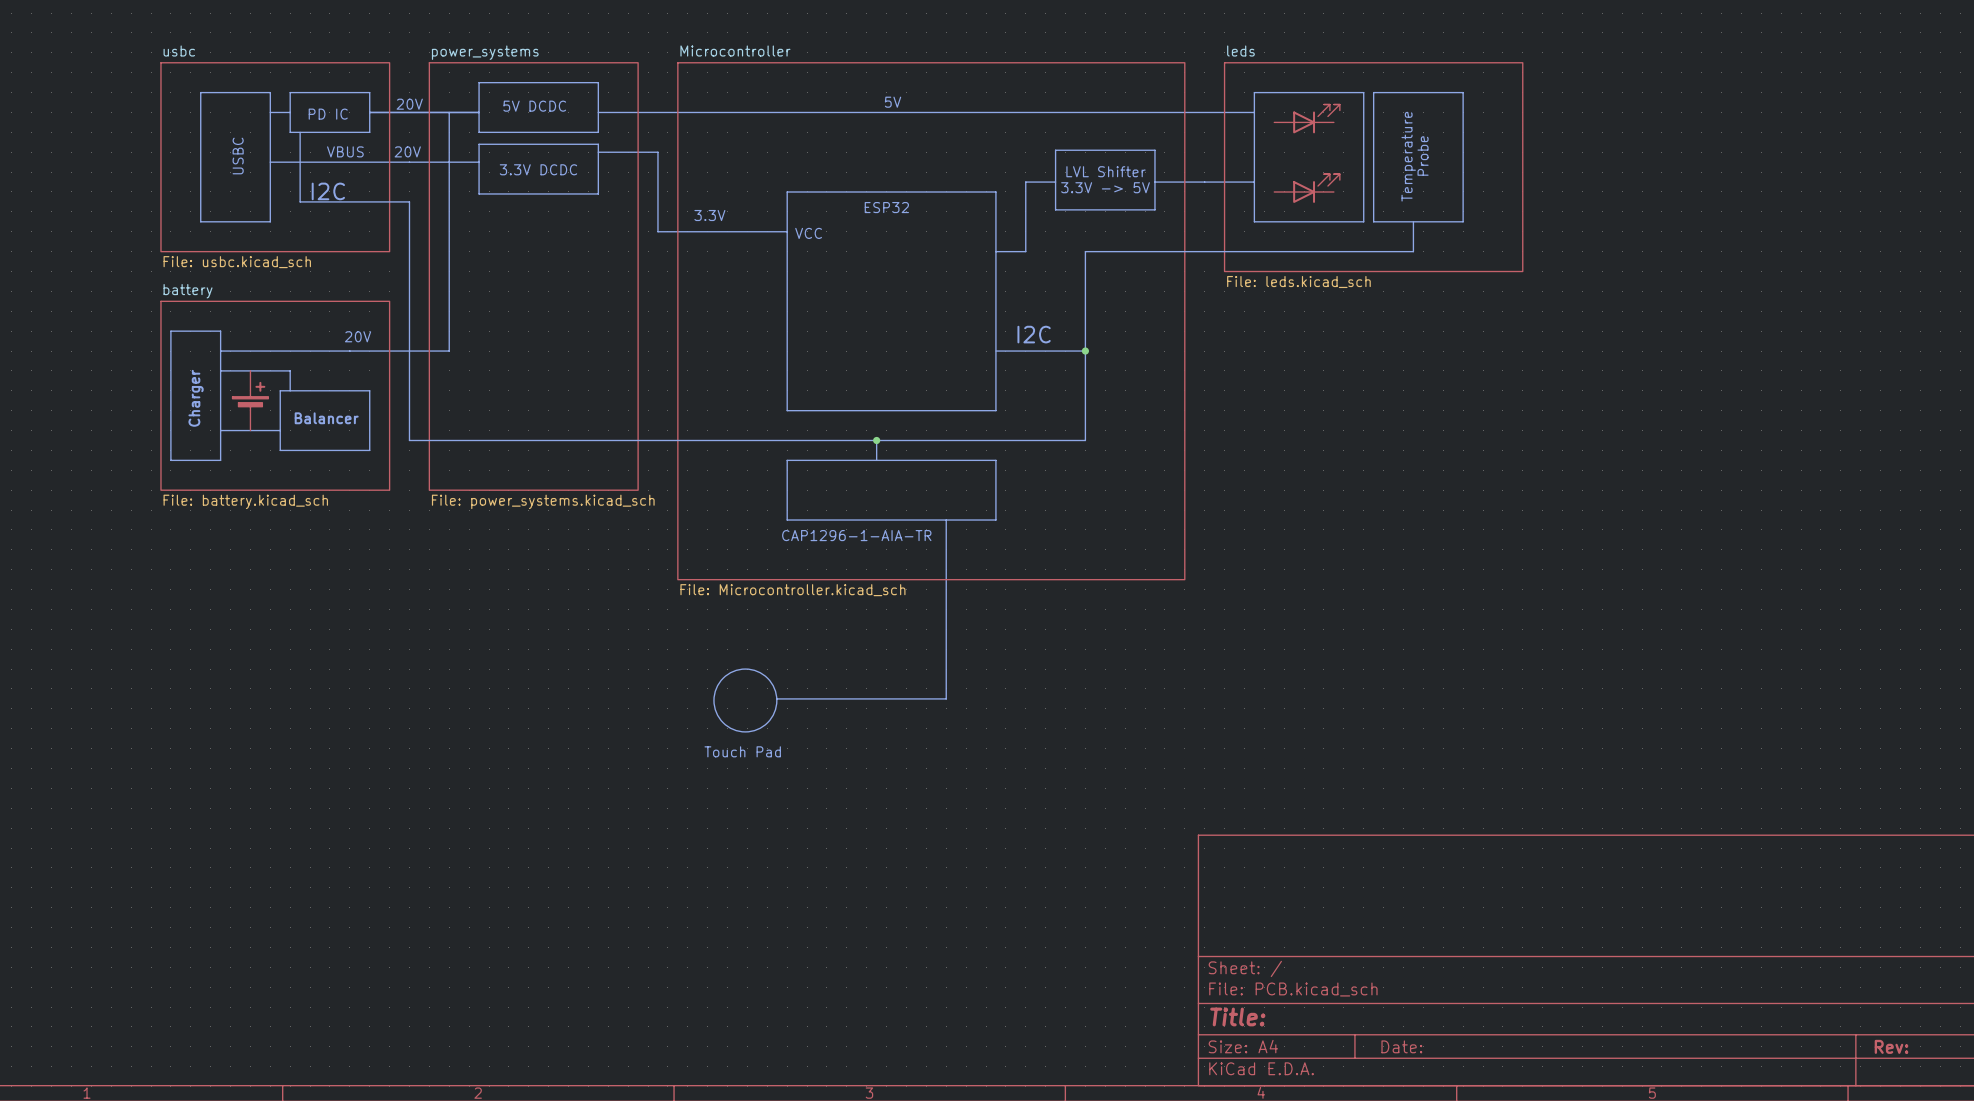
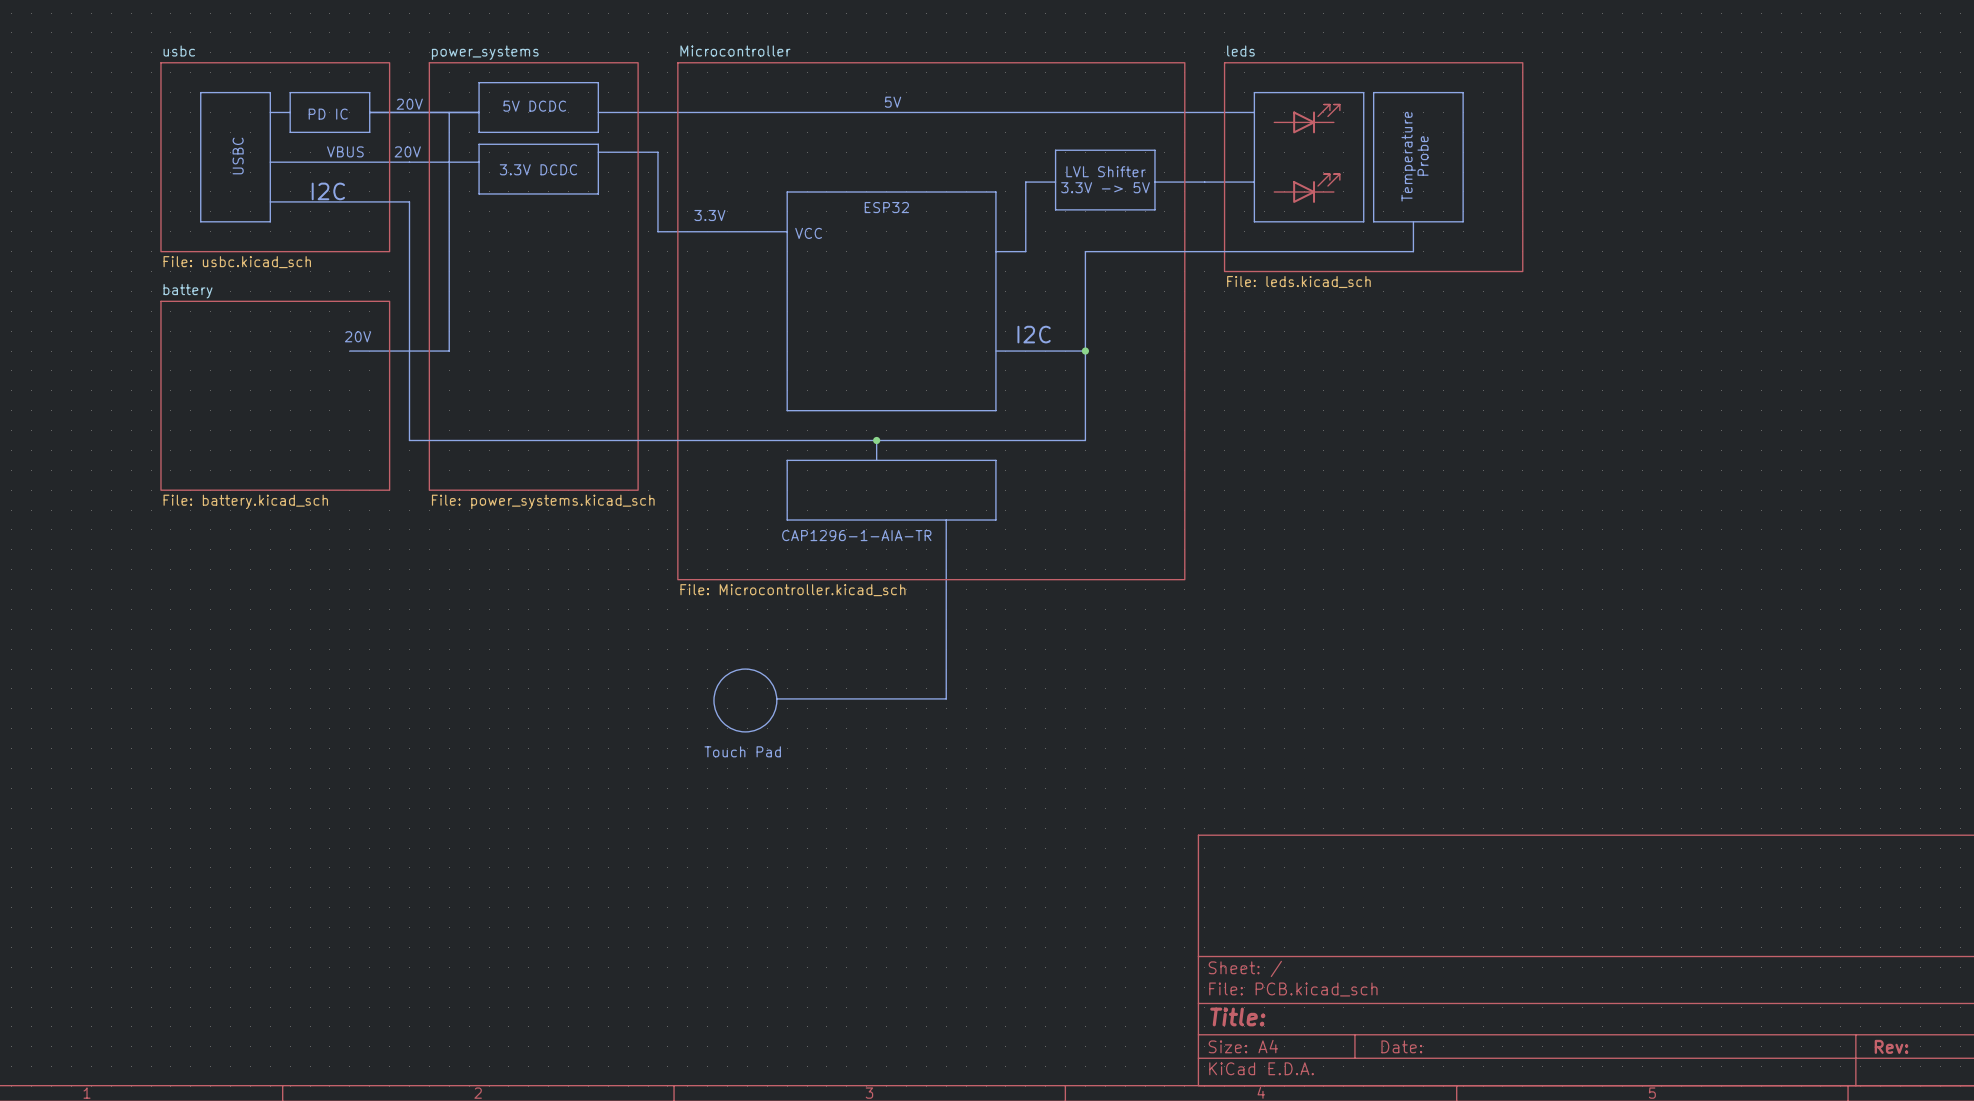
bus: (300, 132) (300, 201) -> (270, 201) (300, 201)
line: (170, 331) (220, 331) (220, 460) (170, 460) (170, 331) -> none
line: (220, 351) (349, 351) -> none
line: (220, 370) (290, 370) (290, 390) -> none
line: (280, 390) (369, 390) (369, 450) (280, 450) (280, 390) -> none
text: Charger (196, 398) -> none
part: (250, 400) -> none
text: Balancer (326, 418) -> none
line: (220, 430) (280, 430) -> none

